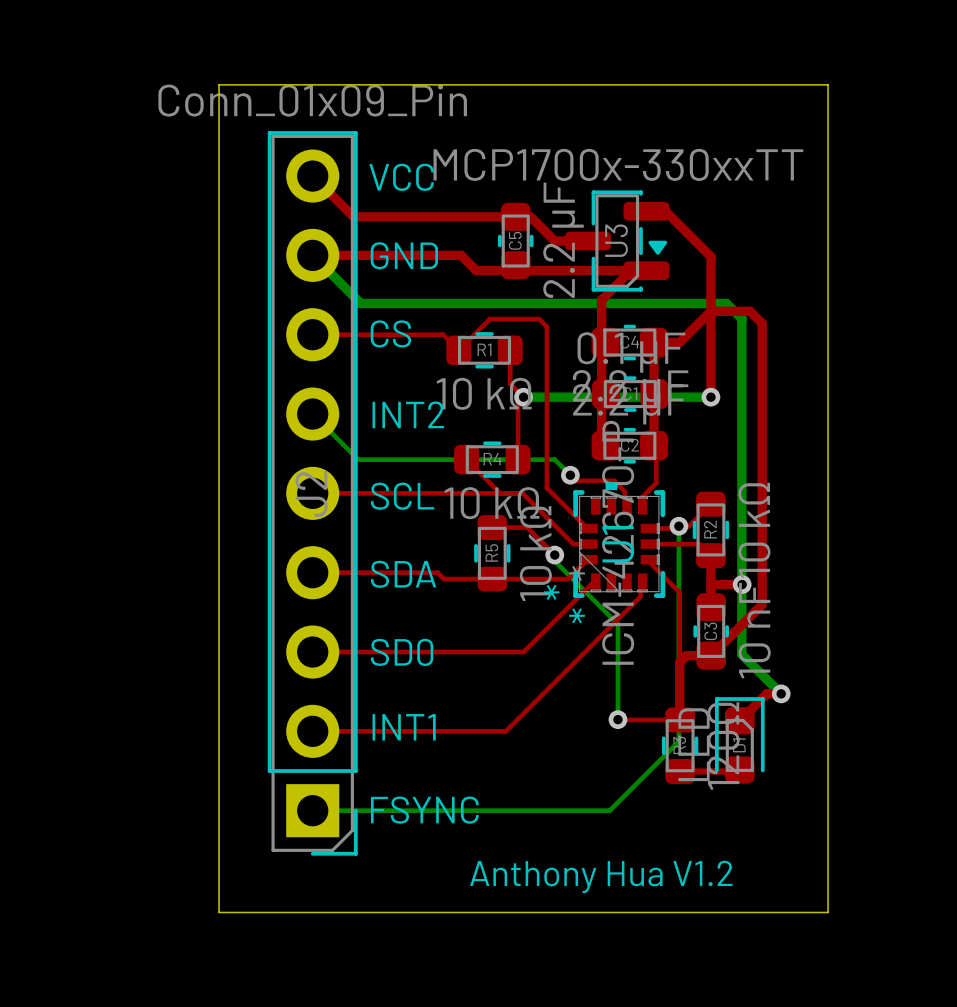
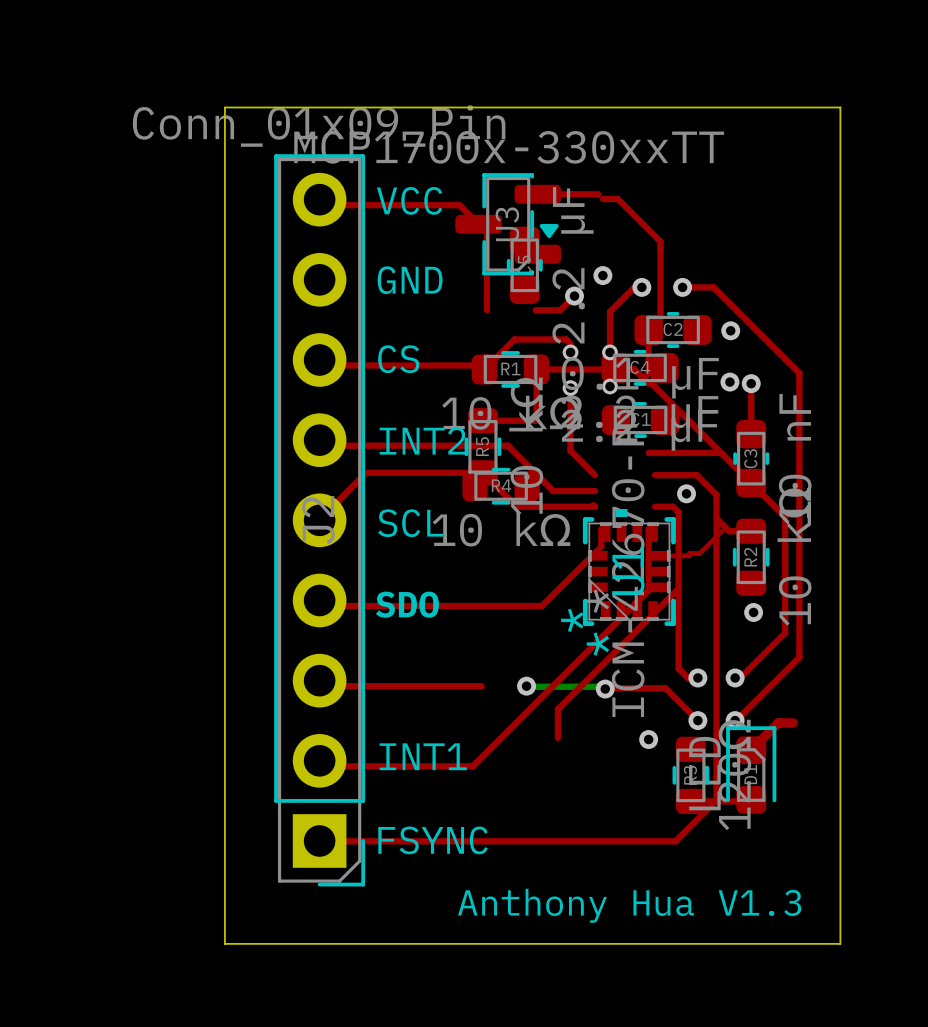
top track: none -> (537, 194) (598, 194)
top track: none -> (602, 199) (617, 199) (660, 241) (660, 318) (648, 330) (648, 373) (640, 381)
top track: (312, 176) (353, 216) (515, 216) -> none
top track: none -> (313, 205) (459, 205) (486, 232) (486, 310)
top track: (630, 211) (665, 211) (710, 256) (710, 397) -> none
top track: (530, 216) (554, 241) (587, 241) -> none
U3 position: (617, 241) -> (508, 224)
via: none -> (602, 275)
top track: (312, 255) (461, 255) (476, 270) (630, 270) (601, 299) (601, 444) -> none
bottom track: (312, 255) (360, 303) (726, 303) (742, 319) -> none
top track: none -> (641, 287) (634, 287) (609, 311) (609, 352)
via: none -> (641, 287)
top track: none -> (682, 287) (713, 287) (799, 373) (799, 657) (735, 720)
via: none -> (682, 287)
top track: none -> (574, 296) (560, 310) (535, 310)
via: none -> (574, 296)
via: none -> (730, 330)
bottom track: (741, 319) (741, 654) (781, 693) -> none
top track: none -> (570, 352) (570, 343) (566, 339) (514, 339) (484, 369)
via: none -> (570, 352)
via: none -> (609, 352)
top track: (312, 334) (443, 334) (458, 350) (489, 319) (539, 319) (546, 326) (546, 488) (587, 528) -> none
top track: none -> (313, 365) (480, 365)
R1 position: (484, 350) -> (510, 369)
top track: (510, 350) (510, 383) (523, 397) (518, 402) (518, 459) -> none
via: none -> (729, 382)
top track: none -> (647, 382) (651, 382) (785, 517) (785, 633) (740, 677) (735, 677)
top track: none -> (648, 383) (634, 369) (536, 369) (536, 419) (535, 420) (482, 420)
top track: none -> (751, 383) (751, 434)
via: none -> (751, 383)
via: none -> (609, 386)
top track: none -> (570, 388) (570, 450) (594, 475)
via: none -> (570, 388)
bottom track: (523, 397) (710, 397) -> none
via: (523, 397) -> none
via: (710, 397) -> none
bottom track: (312, 414) (358, 459) (554, 459) (570, 475) -> none
top track: none -> (313, 445) (507, 445) (553, 490) (594, 490)
top track: none -> (648, 452) (721, 452)
top track: (656, 444) (656, 483) (640, 498) (640, 506) -> none
C2 position: (629, 445) -> (673, 330)
top track: (654, 445) (654, 342) (679, 342) (710, 311) (749, 311) (762, 323) (762, 604) (711, 655) (686, 655) (679, 662) -> none
top track: none -> (655, 475) (696, 475) (716, 494) (716, 800) (675, 841) (311, 841)
top track: (466, 459) (500, 493) -> none
via: none -> (686, 493)
top track: (570, 475) (576, 480) (614, 480) (625, 491) (625, 506) -> none
via: (570, 475) -> none
top track: none -> (593, 505) (594, 506) (516, 506) (482, 472) (366, 472) (313, 525)
top track: none -> (655, 506) (673, 506) (678, 512) (678, 668) (688, 677) (697, 677)
top track: none -> (716, 519) (729, 531) (751, 531)
top track: (312, 493) (522, 493) (573, 544) (587, 544) -> none
top track: none -> (601, 529) (601, 546) (541, 606) (313, 606)
top track: none -> (648, 529) (648, 590) (472, 766) (313, 766)
bottom track: (678, 526) (678, 741) (609, 810) (312, 810) -> none
via: (678, 526) -> none
top track: (492, 527) (527, 527) (554, 555) -> none
R2 position: (710, 529) -> (751, 557)
top track: (646, 544) (699, 544) (710, 555) (710, 606) -> none
R5 position: (492, 553) -> (482, 446)
bottom track: (554, 555) (554, 561) (617, 624) (617, 719) -> none
via: (554, 555) -> none
top track: (587, 559) (568, 579) (444, 579) (437, 572) (312, 572) -> none
top track: (646, 559) (679, 592) (679, 662) -> none
top track: none -> (678, 588) (557, 709) (557, 737)
text: SDA (403, 574) -> SDO (407, 604)
top track: (593, 581) (523, 652) (312, 652) -> none
top track: (640, 581) (640, 596) (505, 731) (312, 731) -> none
top track: (710, 584) (742, 584) -> none
C3 position: (711, 631) -> (751, 458)
via: none -> (697, 677)
via: none -> (735, 677)
text: SD0 (402, 652) -> none
top track: none -> (313, 686) (481, 686)
bottom track: none -> (526, 686) (602, 686) (605, 689)
via: none -> (526, 686)
top track: none -> (605, 689) (665, 688) (697, 720)
via: none -> (605, 689)
top track: (679, 662) (679, 709) -> none
via: none -> (697, 720)
via: none -> (735, 720)
via: (781, 693) -> none
via position: (617, 719) -> (648, 739)
top track: (618, 719) (680, 719) -> none
text: Anthony Hua V1.2 (601, 876) -> Anthony Hua V1.3 (629, 905)

